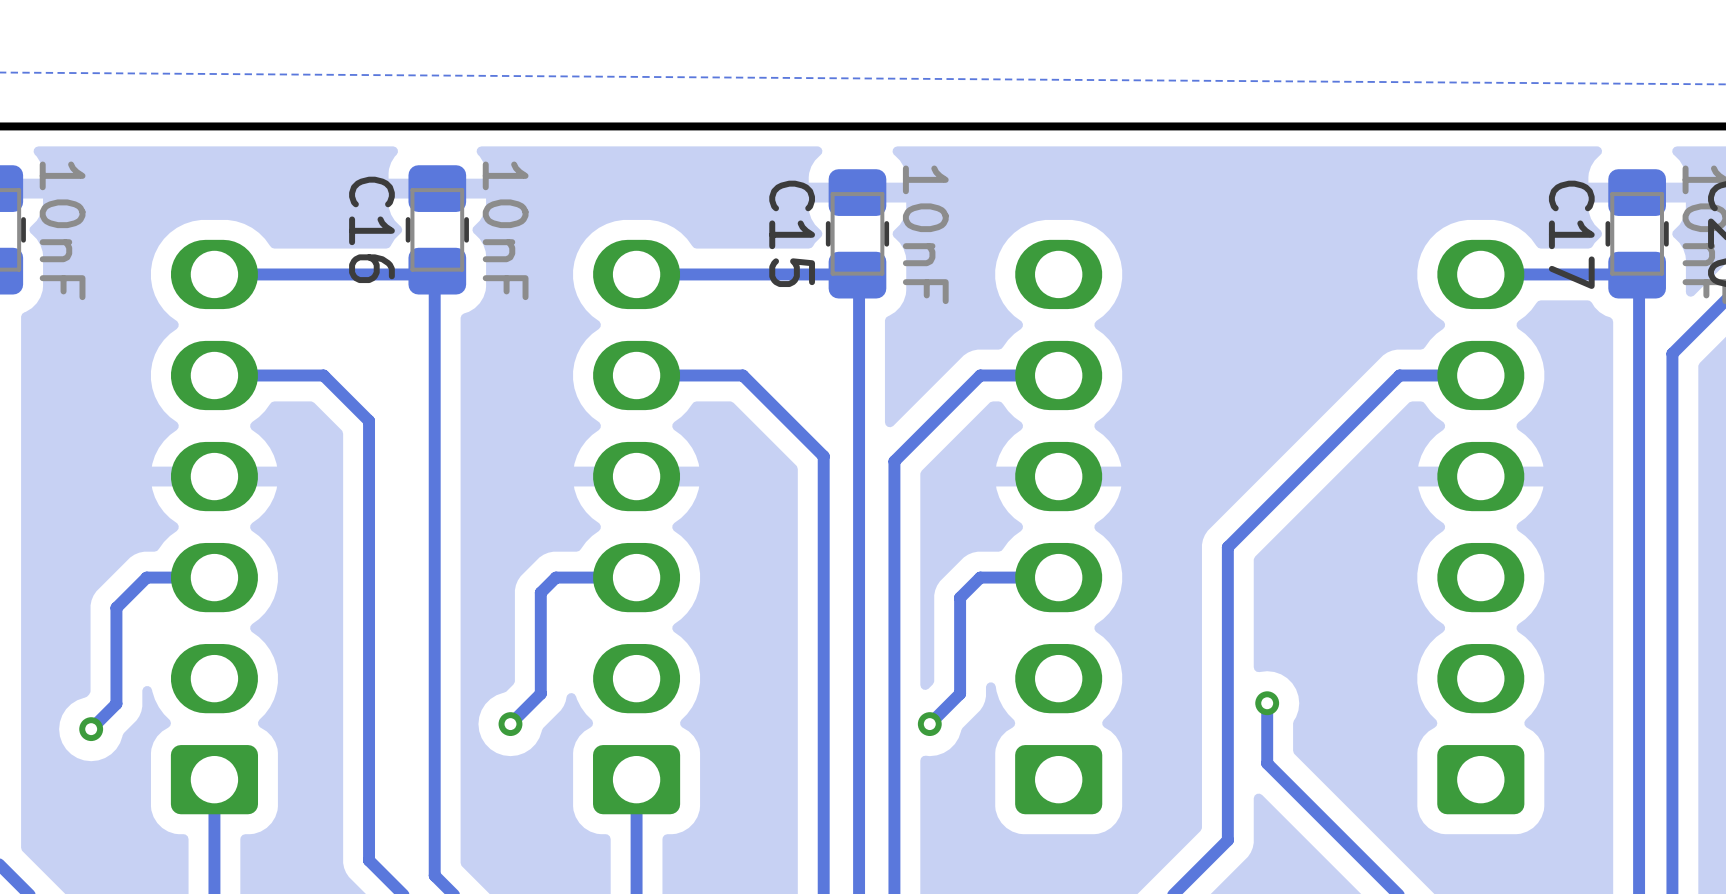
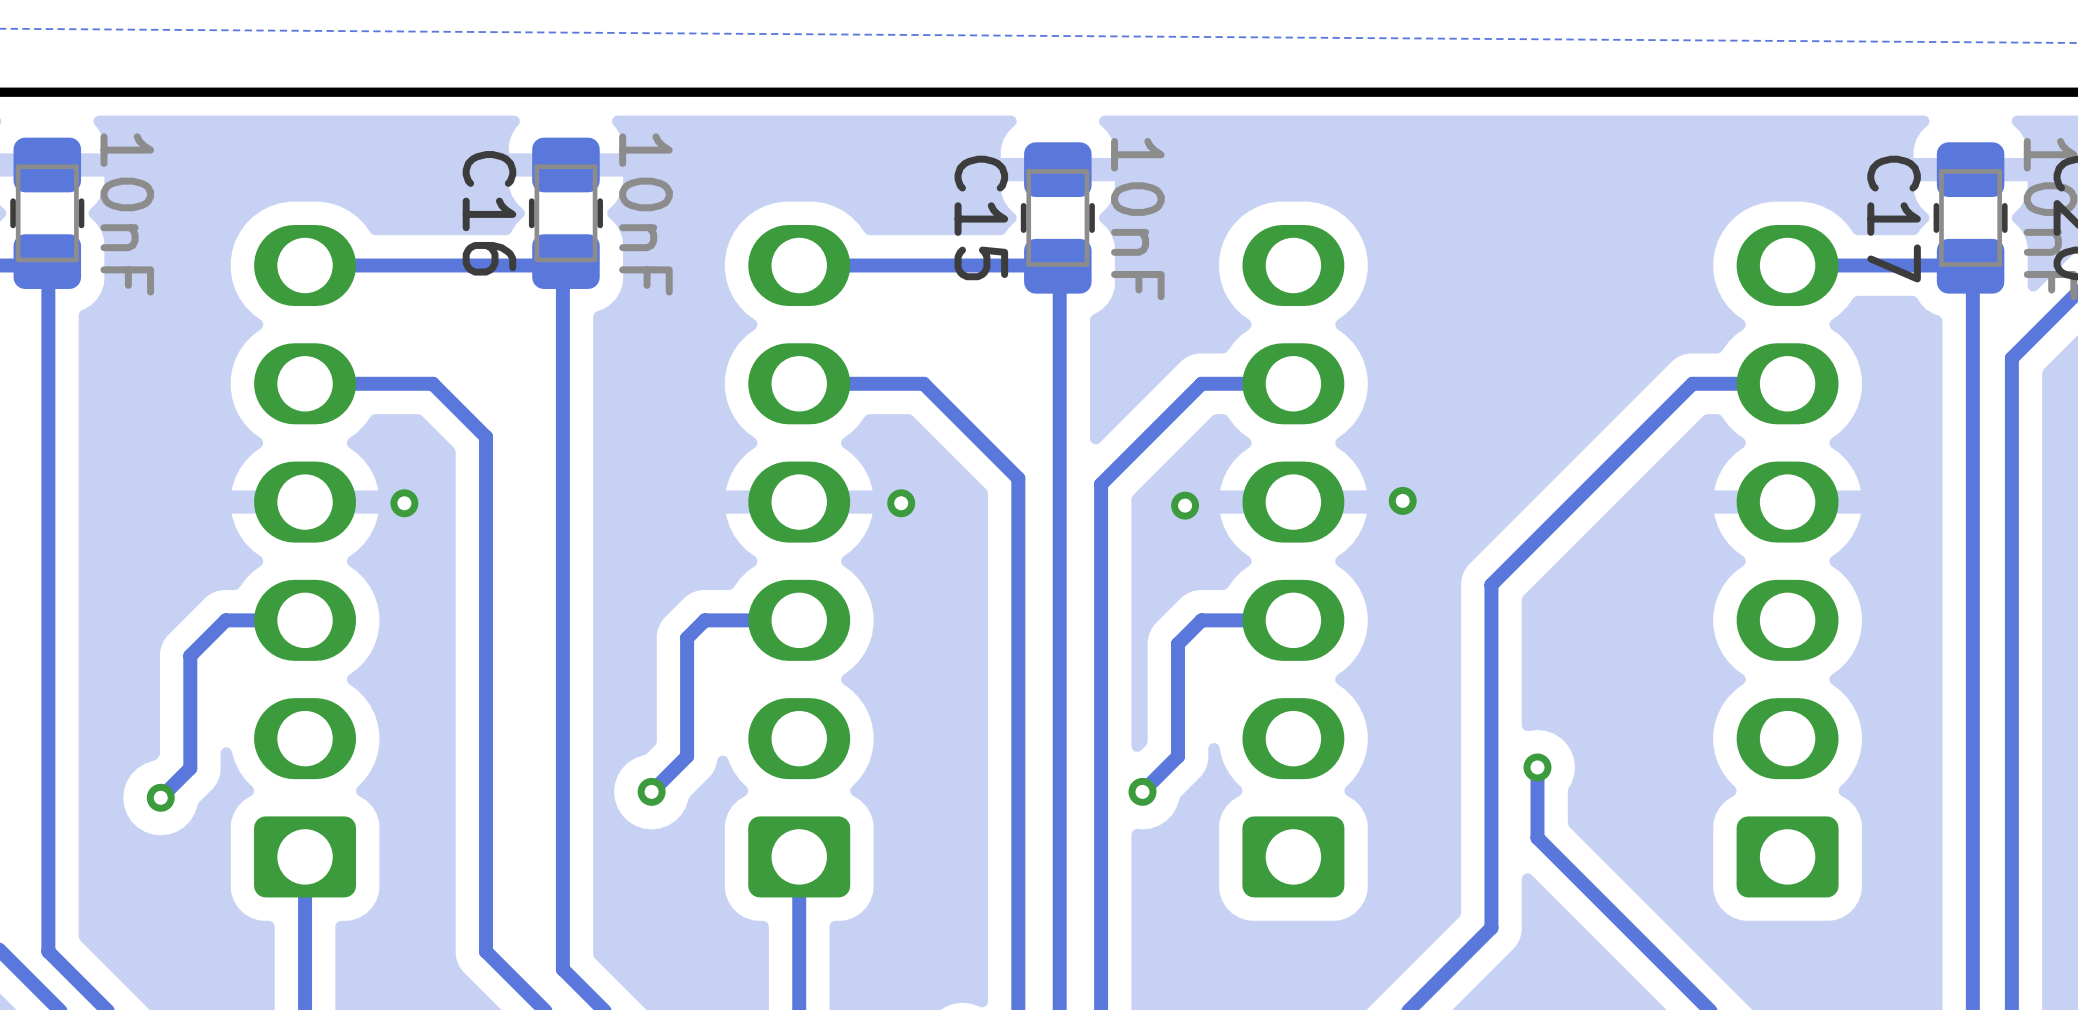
via: none -> (1402, 500)
via: none -> (404, 503)
via: none -> (901, 503)
via: none -> (1185, 505)

